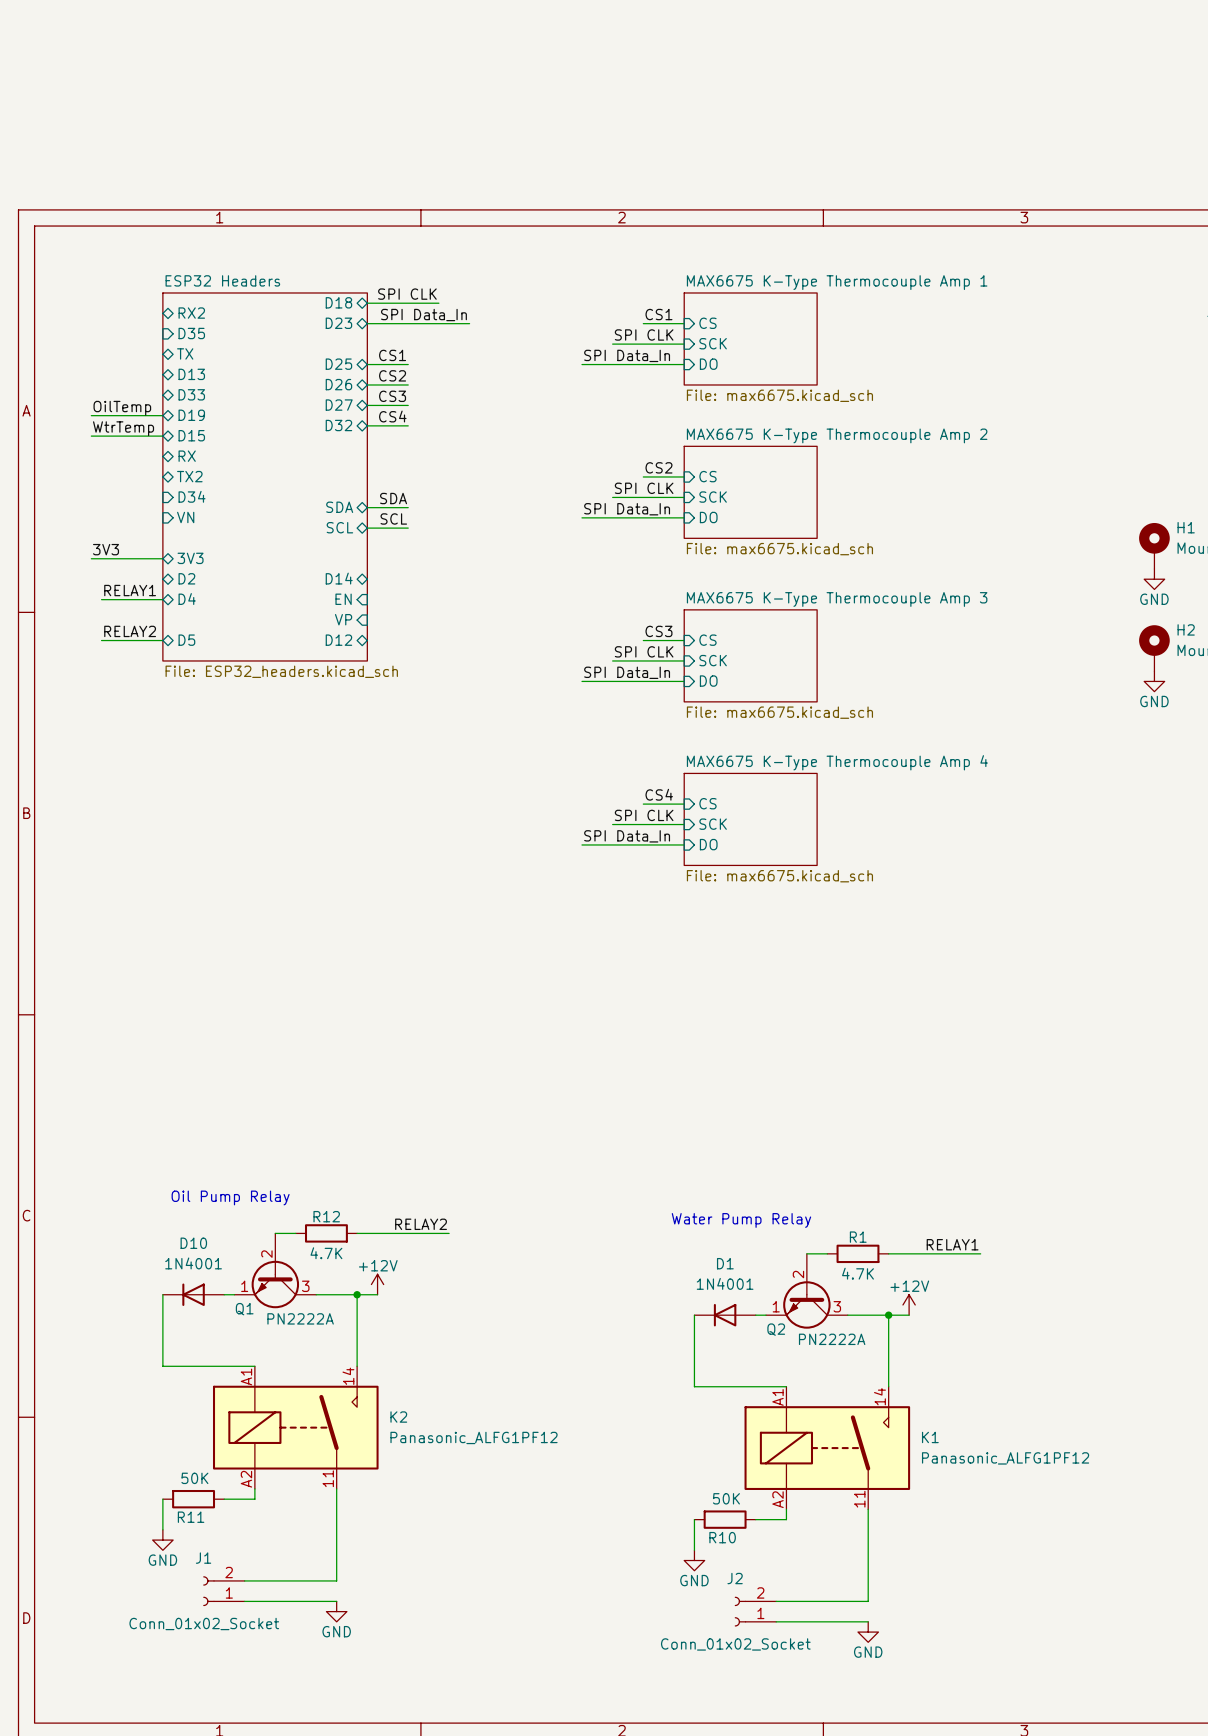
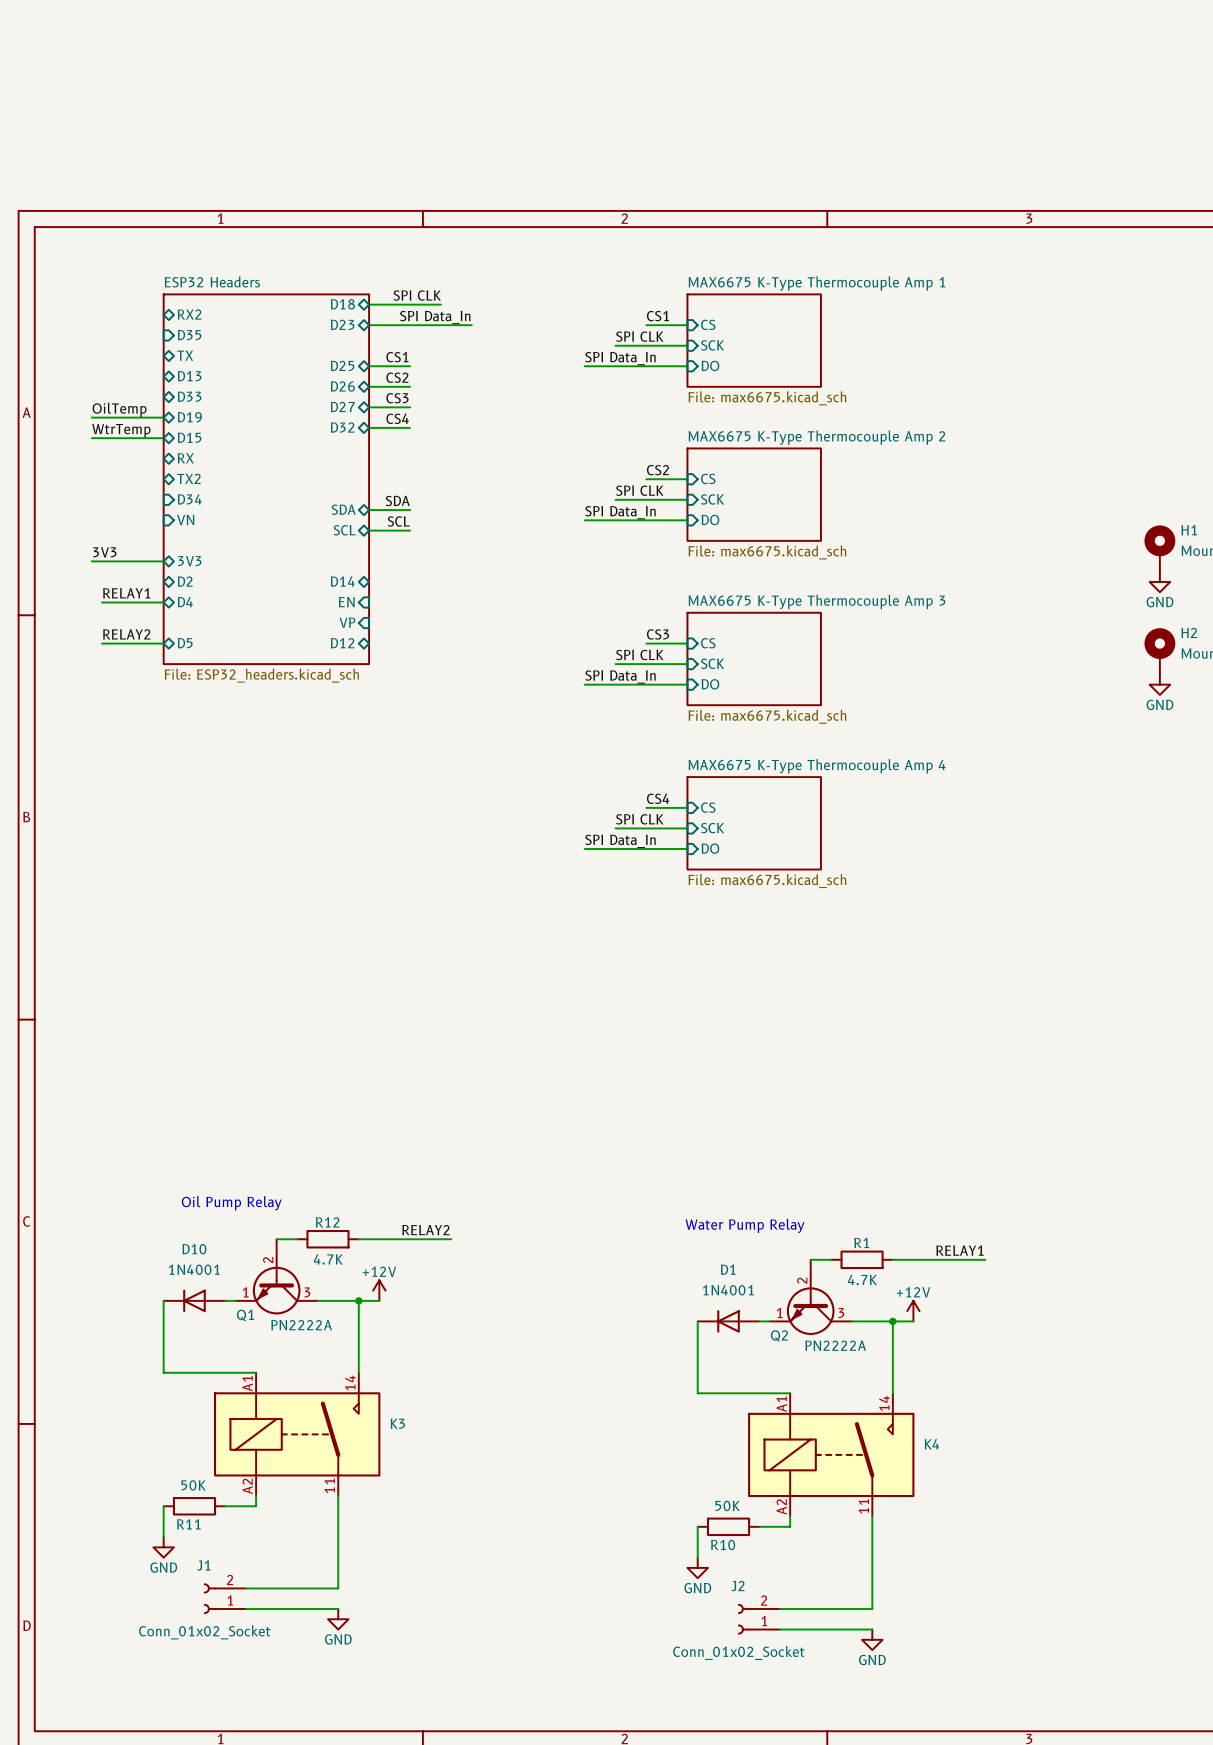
K2 name: K2 (398, 1417) -> K3 (397, 1423)
K2 value: Panasonic_ALFG1PF12 (474, 1437) -> none
K1 name: K1 (930, 1437) -> K4 (931, 1444)
K1 value: Panasonic_ALFG1PF12 (1005, 1458) -> none

